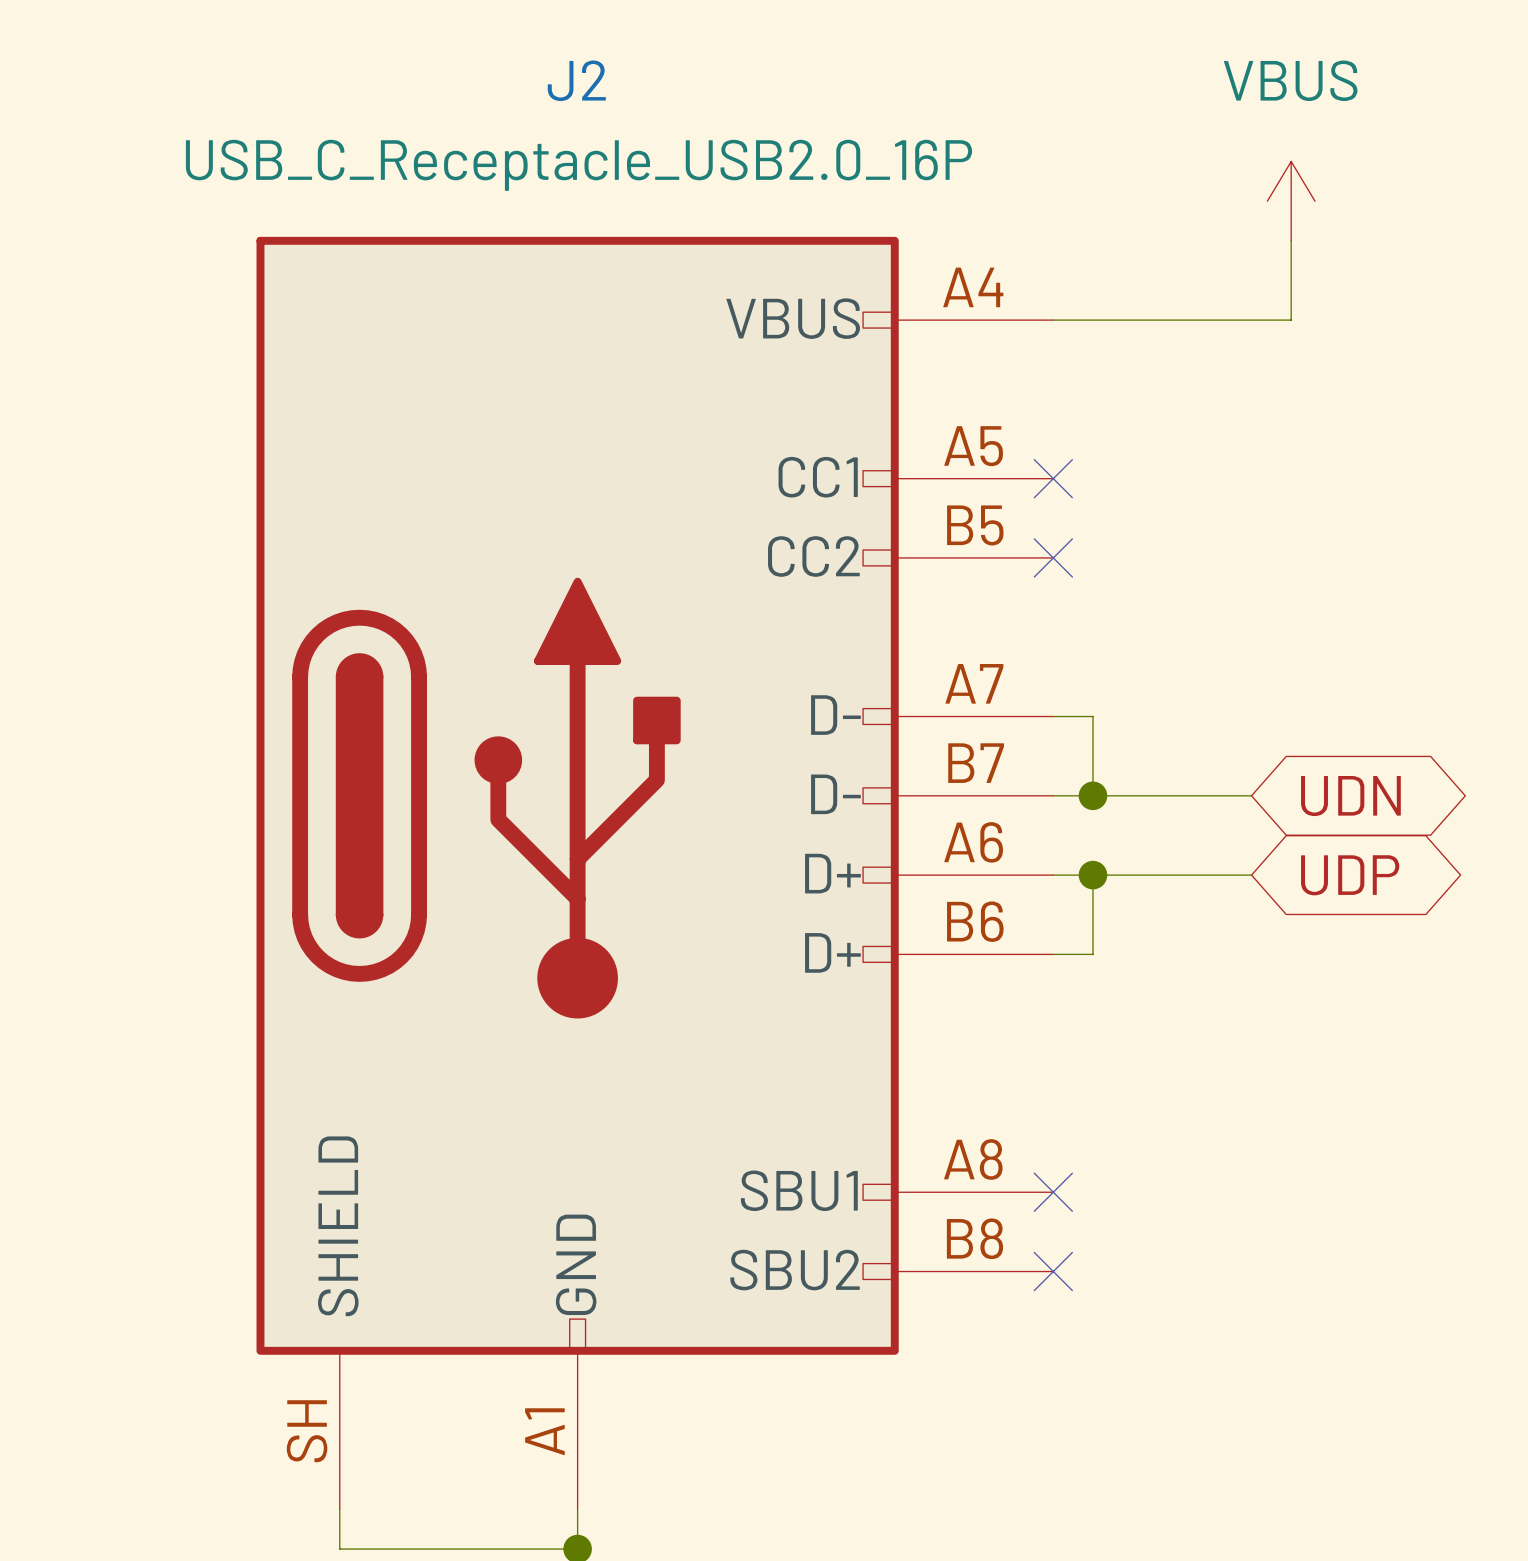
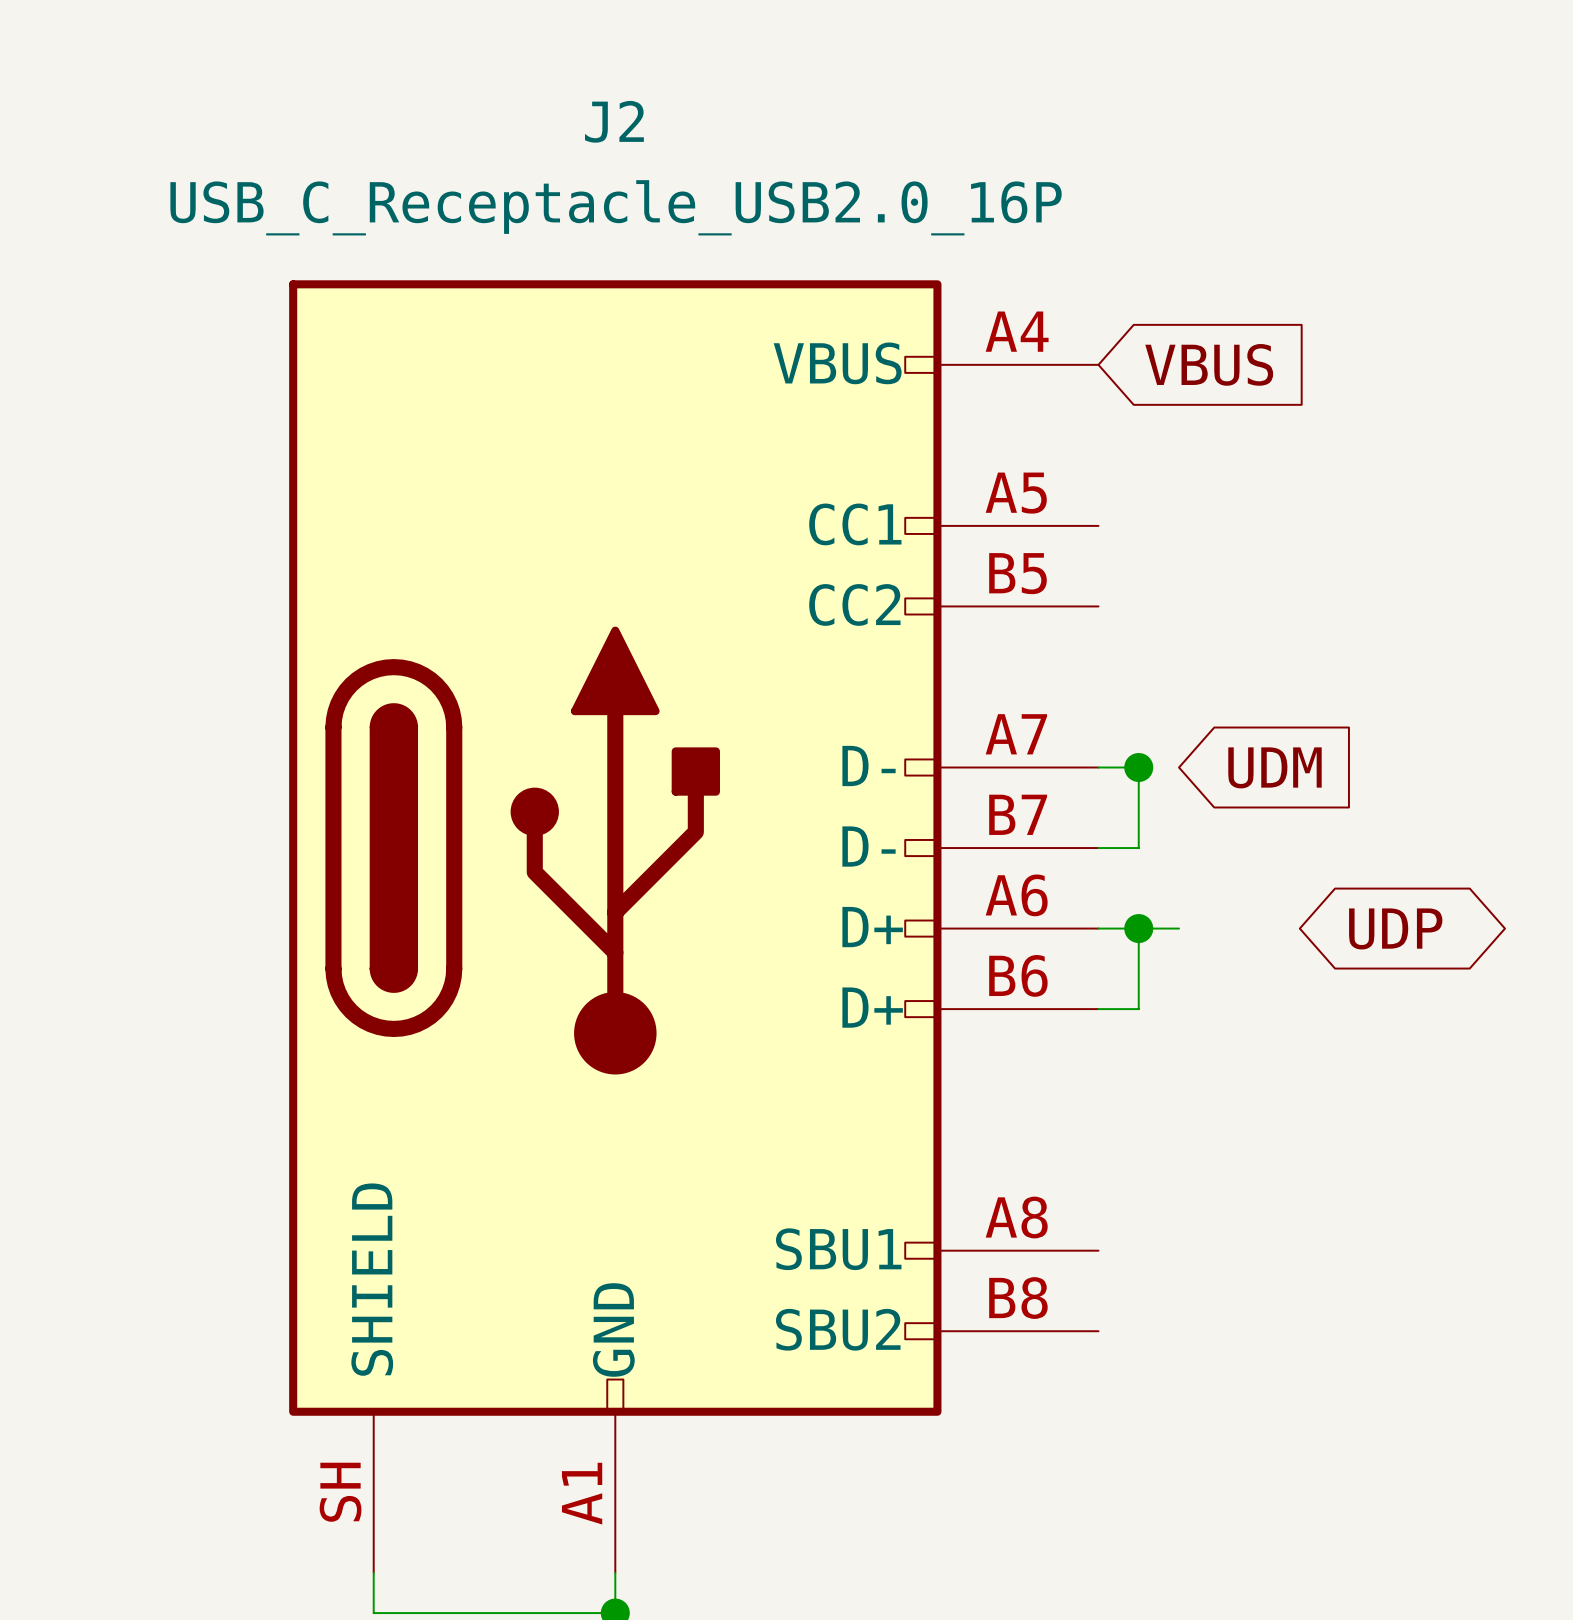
power symbol: VBUS (1291, 201) -> none
wire: (1291, 240) (1291, 320) (1053, 320) -> none
global label: none -> VBUS (1209, 364)
no-connect mark: (1053, 478) -> none
no-connect mark: (1053, 557) -> none
wire: (1092, 795) (1251, 795) -> none
junction position: (1092, 795) -> (1138, 767)
global label shape: bidirectional (1350, 796) -> input (1274, 767)
global label: UDN (1350, 796) -> UDM (1274, 767)
wire: (1132, 875) (1251, 875) -> none
no-connect mark: (1053, 1192) -> none
no-connect mark: (1053, 1271) -> none

